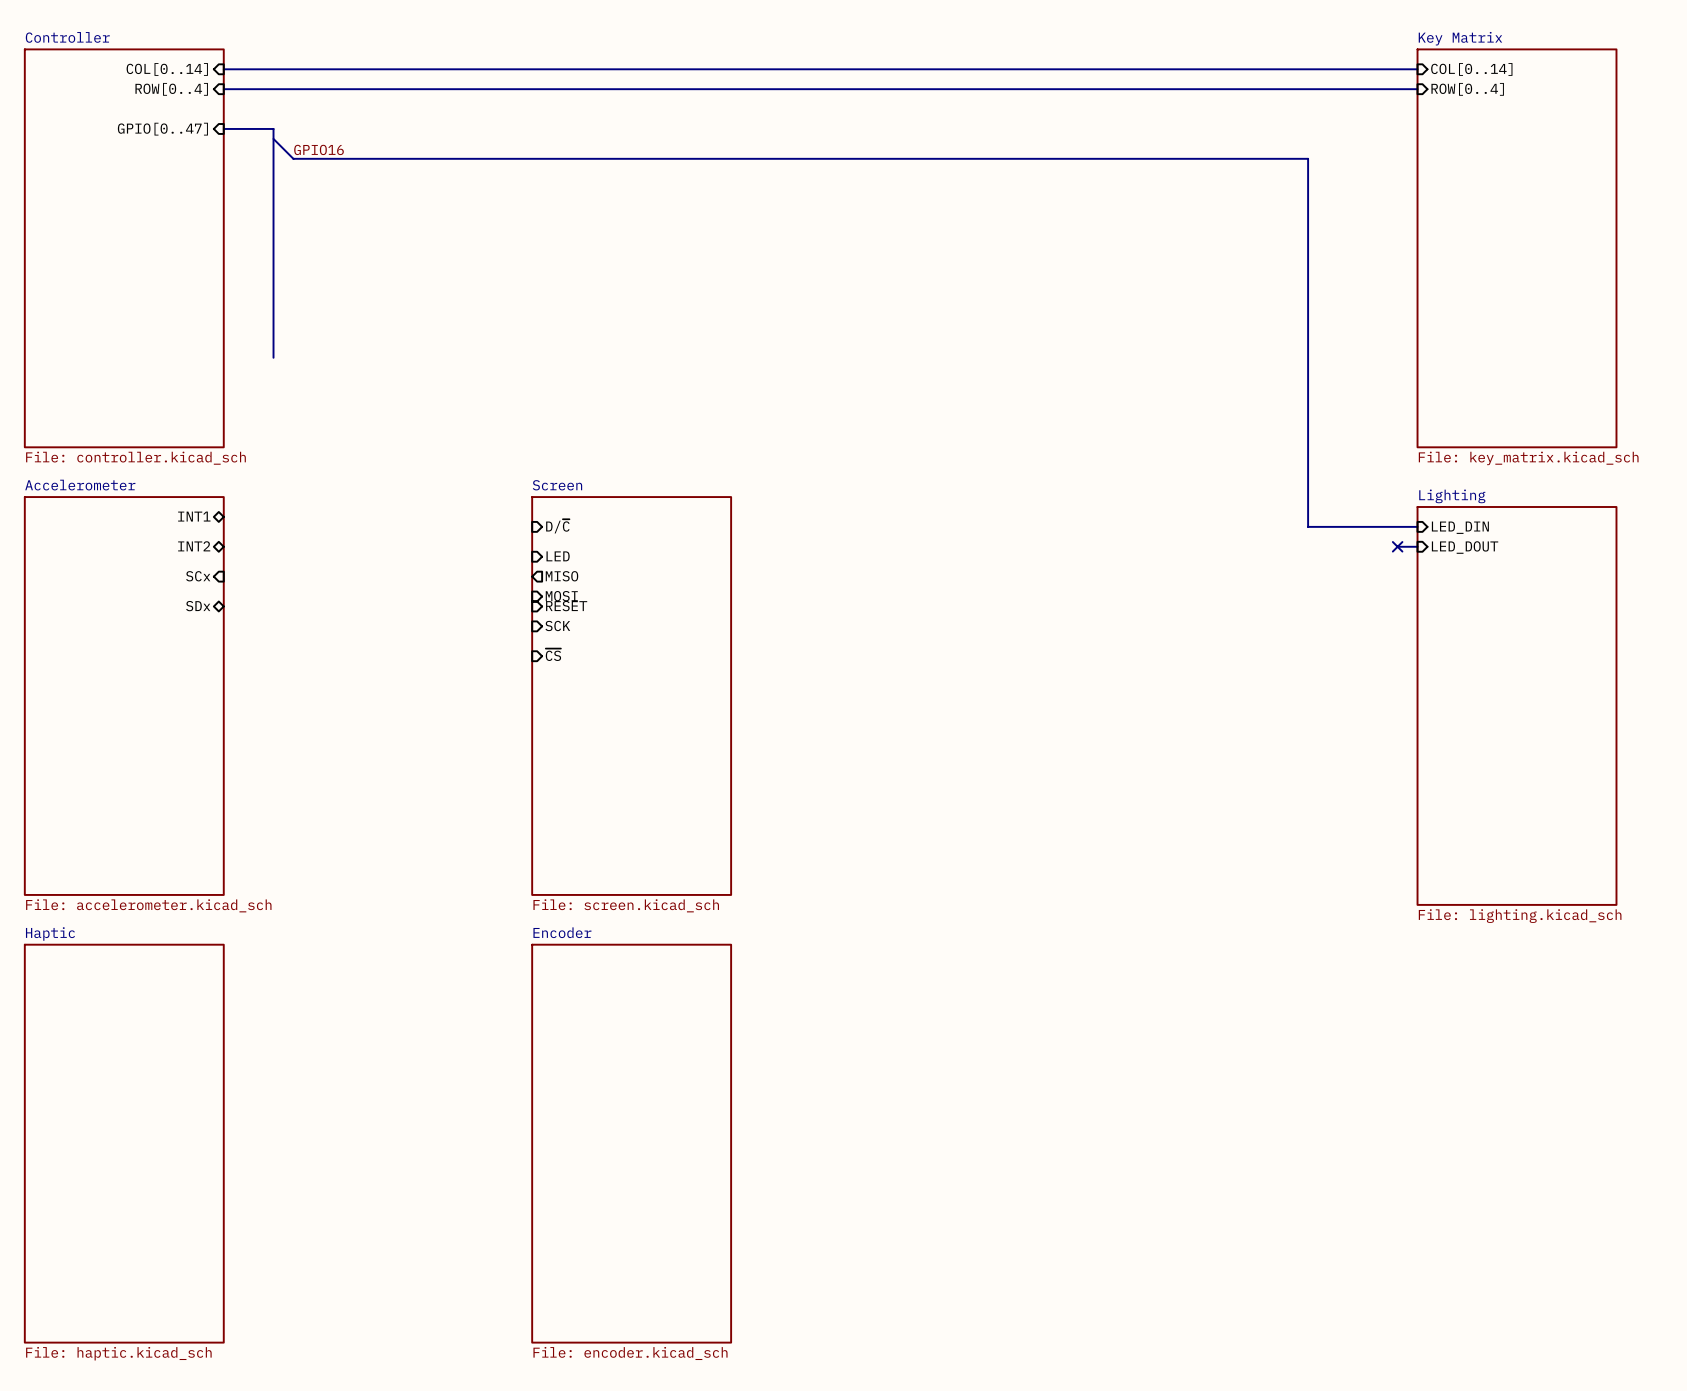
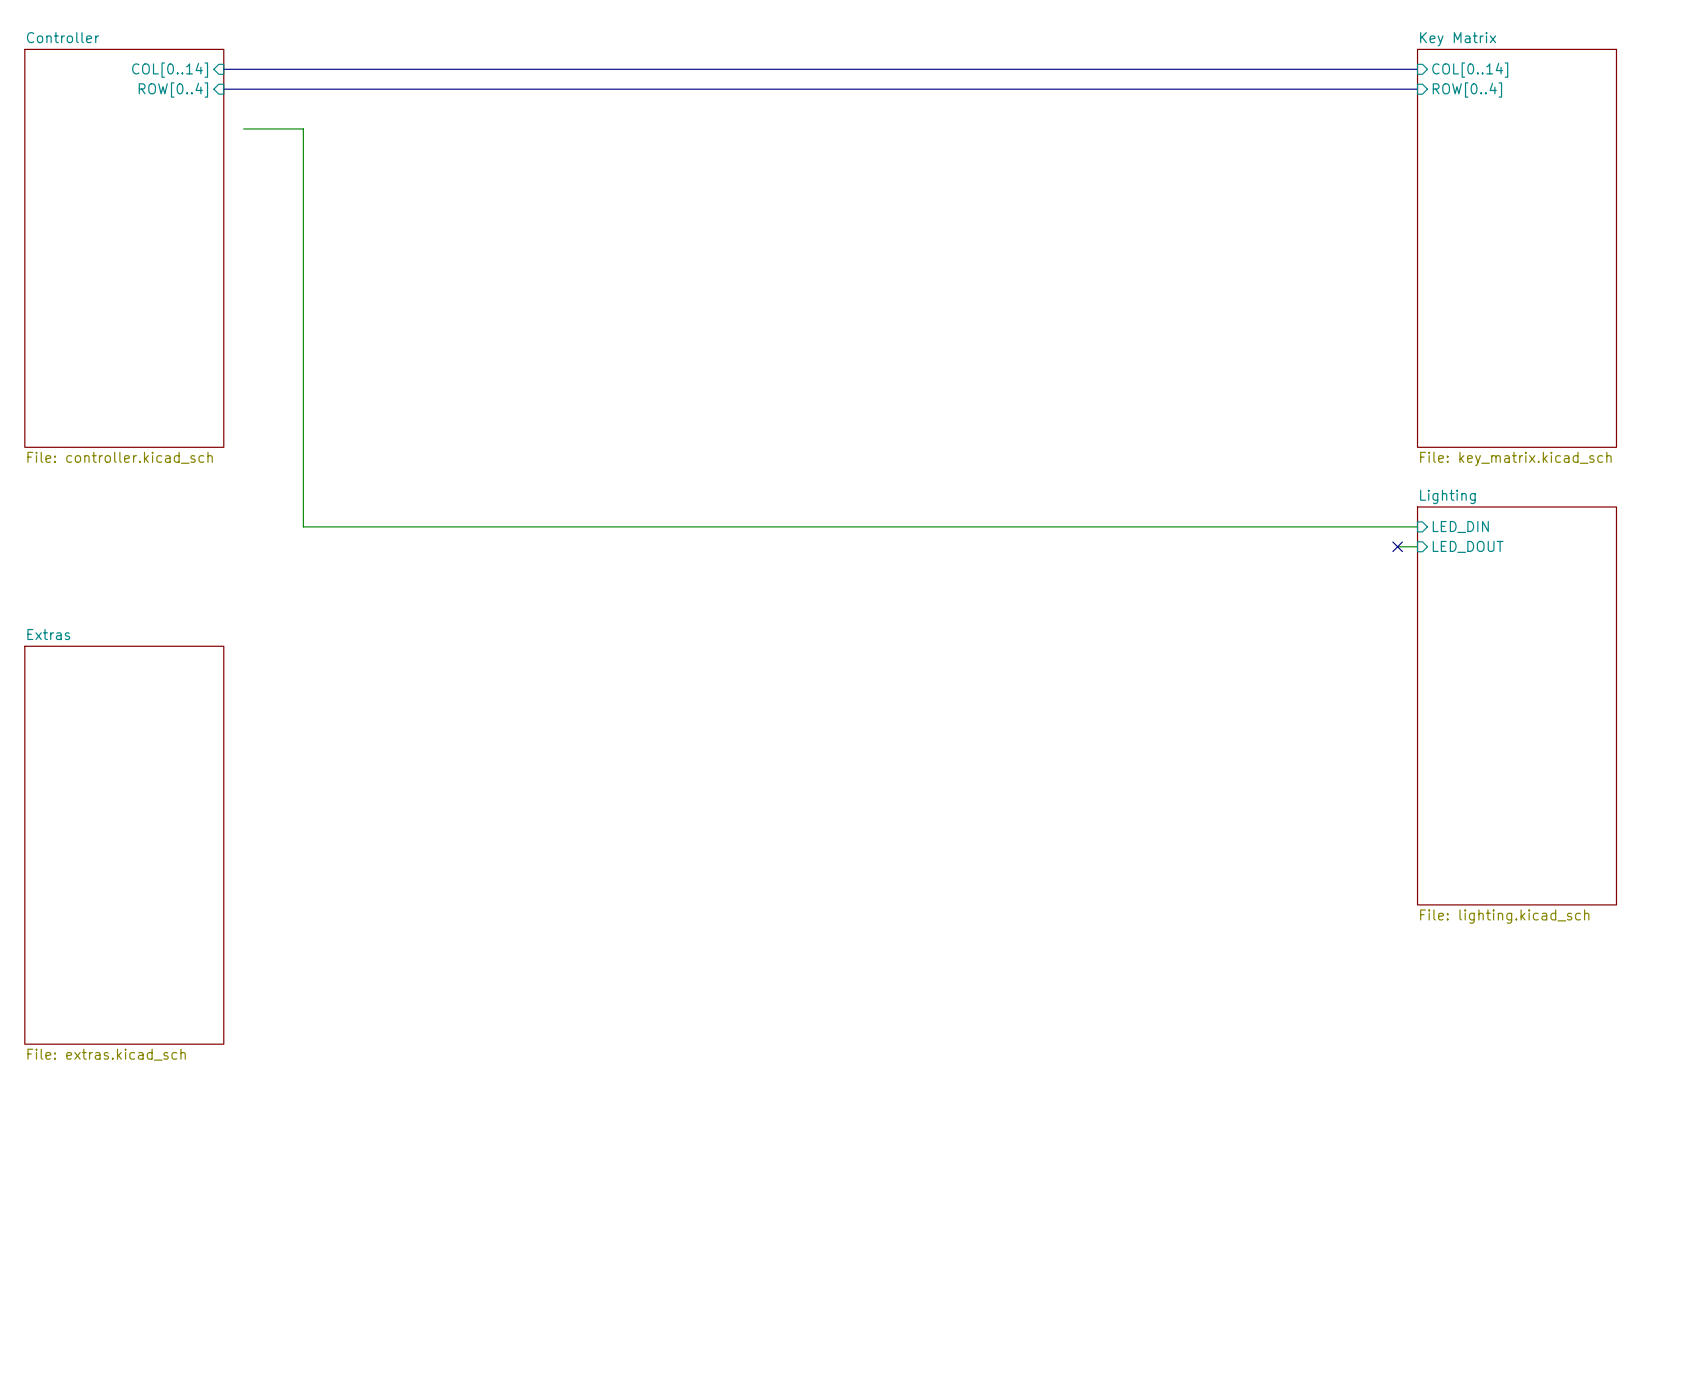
bus: (223, 128) (273, 128) (273, 357) -> none
sheet pin: GPIO[0..47] (162, 129) -> none
wire: (273, 138) (293, 158) (1308, 158) (1308, 526) -> (243, 128) (303, 128) (303, 526) (1308, 526)
label: GPIO16 (319, 149) -> none
sheet pin: INT1 (194, 516) -> none
sheet pin: D/~{C} (557, 526) -> none
sheet pin: INT2 (194, 546) -> none
sheet pin: LED (558, 556) -> none
sheet pin: SCx (198, 576) -> none
sheet pin: MISO (561, 576) -> none
sheet pin: MOSI (561, 596) -> none
sheet pin: SDx (198, 606) -> none
sheet pin: RESET (566, 606) -> none
sheet pin: SCK (557, 626) -> none
sheet pin: ~{CS} (553, 654) -> none
sheet Accelerometer: File: accelerometer.kicad_sch (124, 696) -> none
sheet Screen: File: screen.kicad_sch (631, 696) -> none
sheet Extras: none -> File: extras.kicad_sch (124, 845)
sheet Haptic: File: haptic.kicad_sch (124, 1143) -> none
sheet Encoder: File: encoder.kicad_sch (631, 1143) -> none

